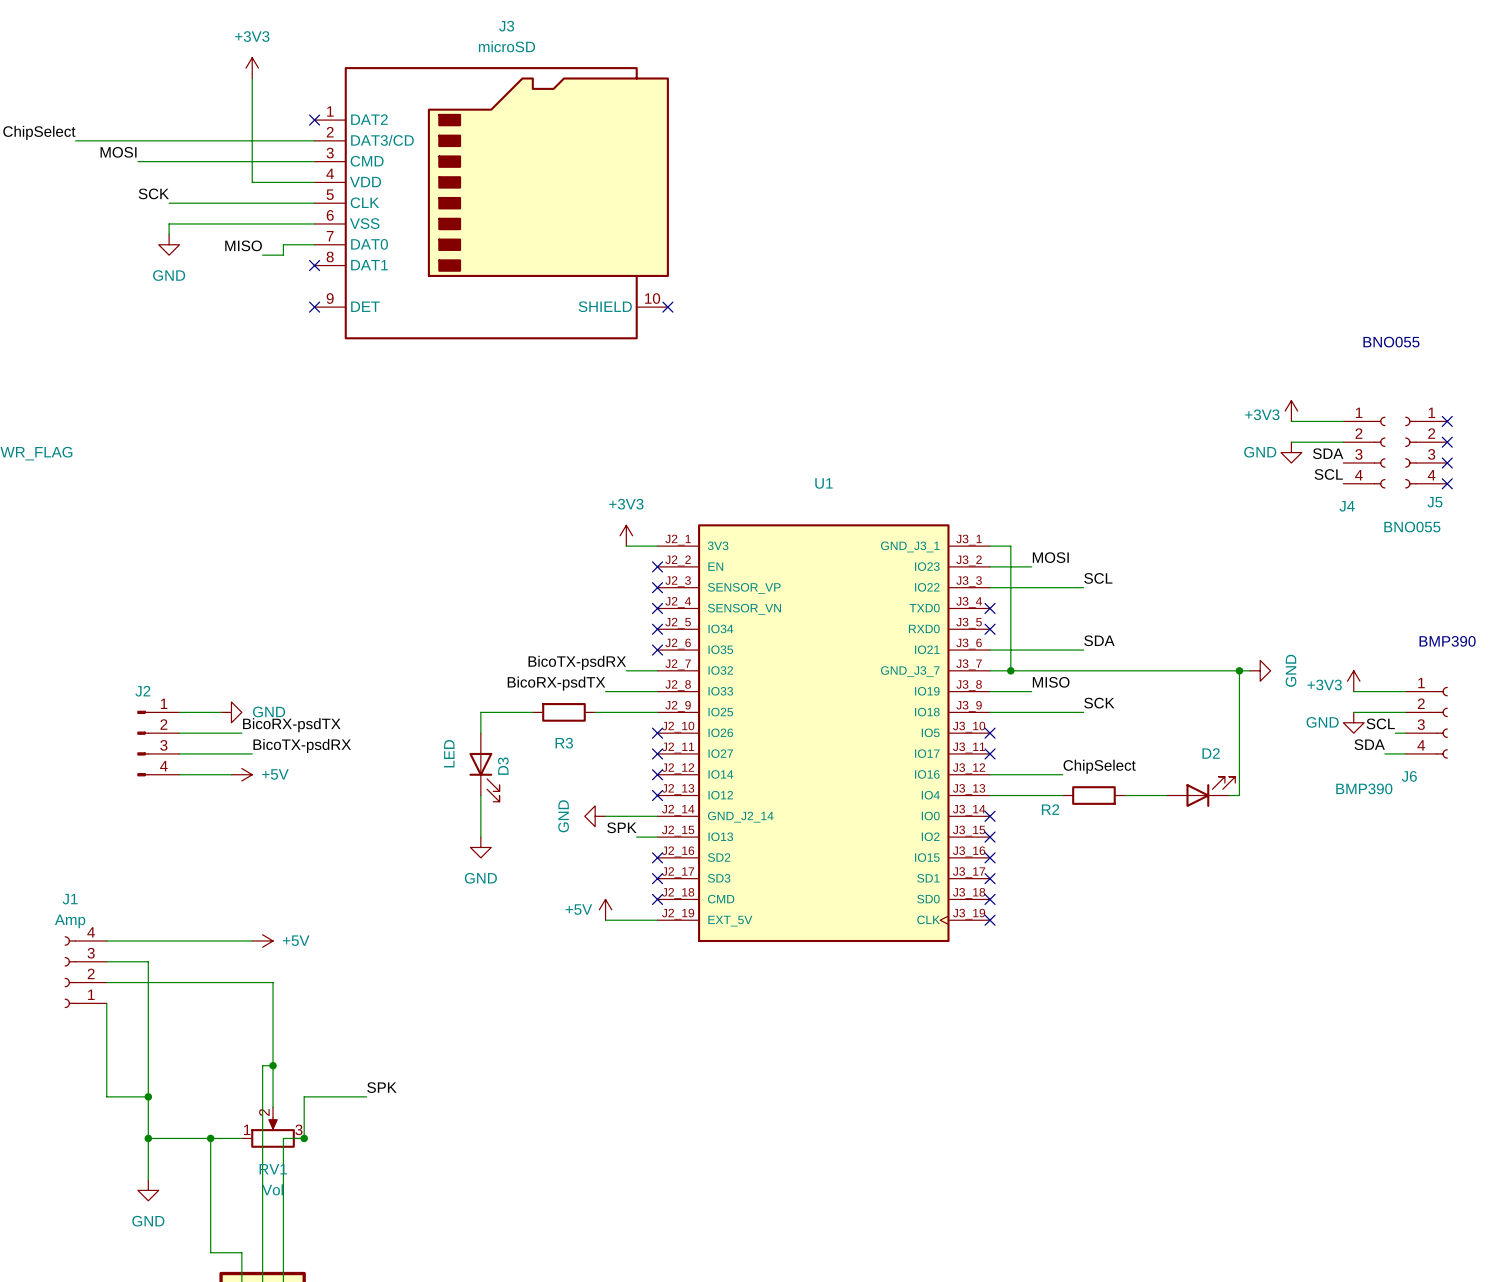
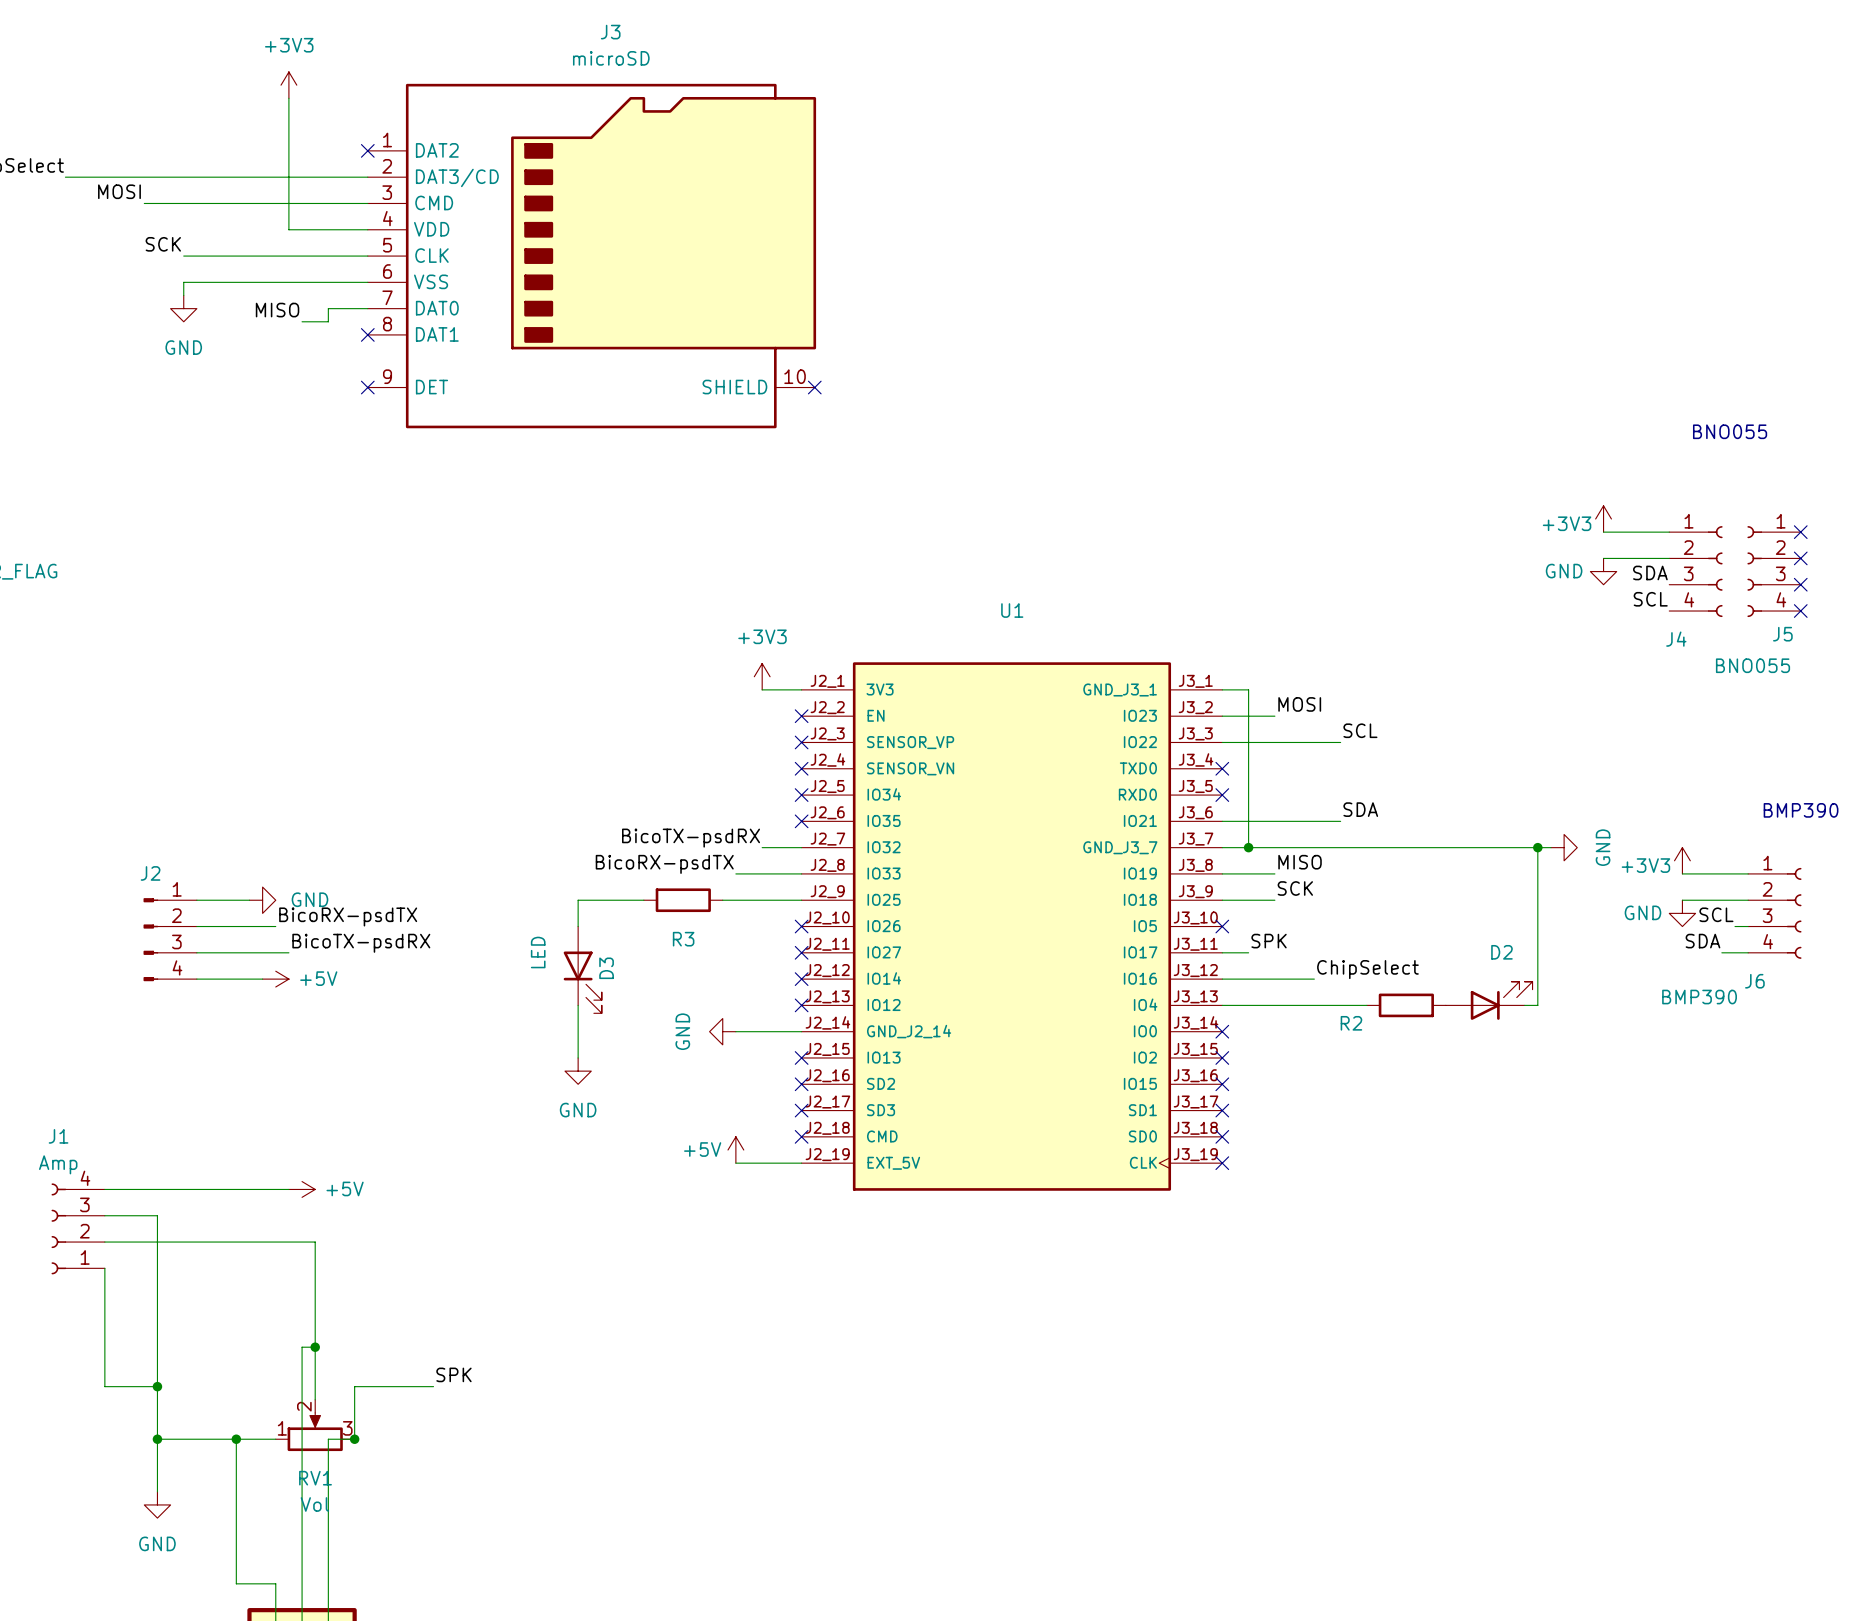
label position: SCK (1099, 703) -> SCK (1295, 888)
wire: (1031, 712) (1083, 712) -> none
label: none -> SPK (1269, 941)
wire: none -> (1222, 952) (1248, 952)
no-connect mark: (990, 753) -> none
R2 position: (1093, 795) -> (1406, 1005)
wire: (1125, 795) (1166, 795) -> (1314, 1005) (1366, 1005)
label: SPK (621, 827) -> none
wire: (636, 837) (657, 837) -> none
no-connect mark: none -> (801, 1057)

